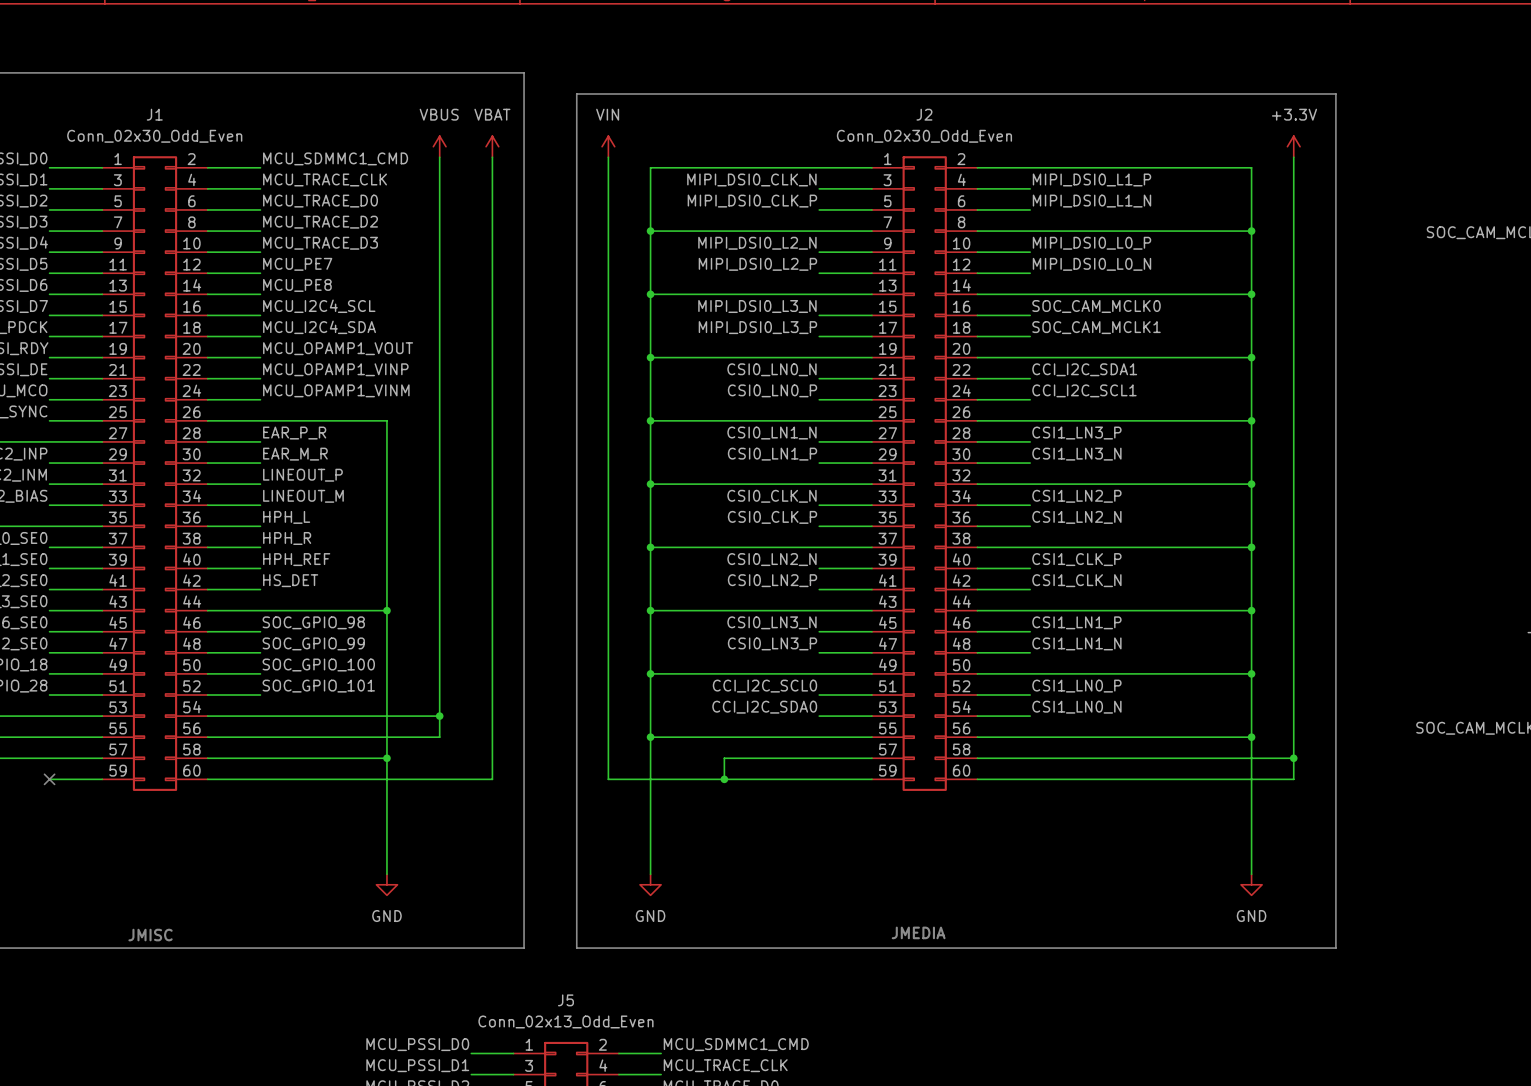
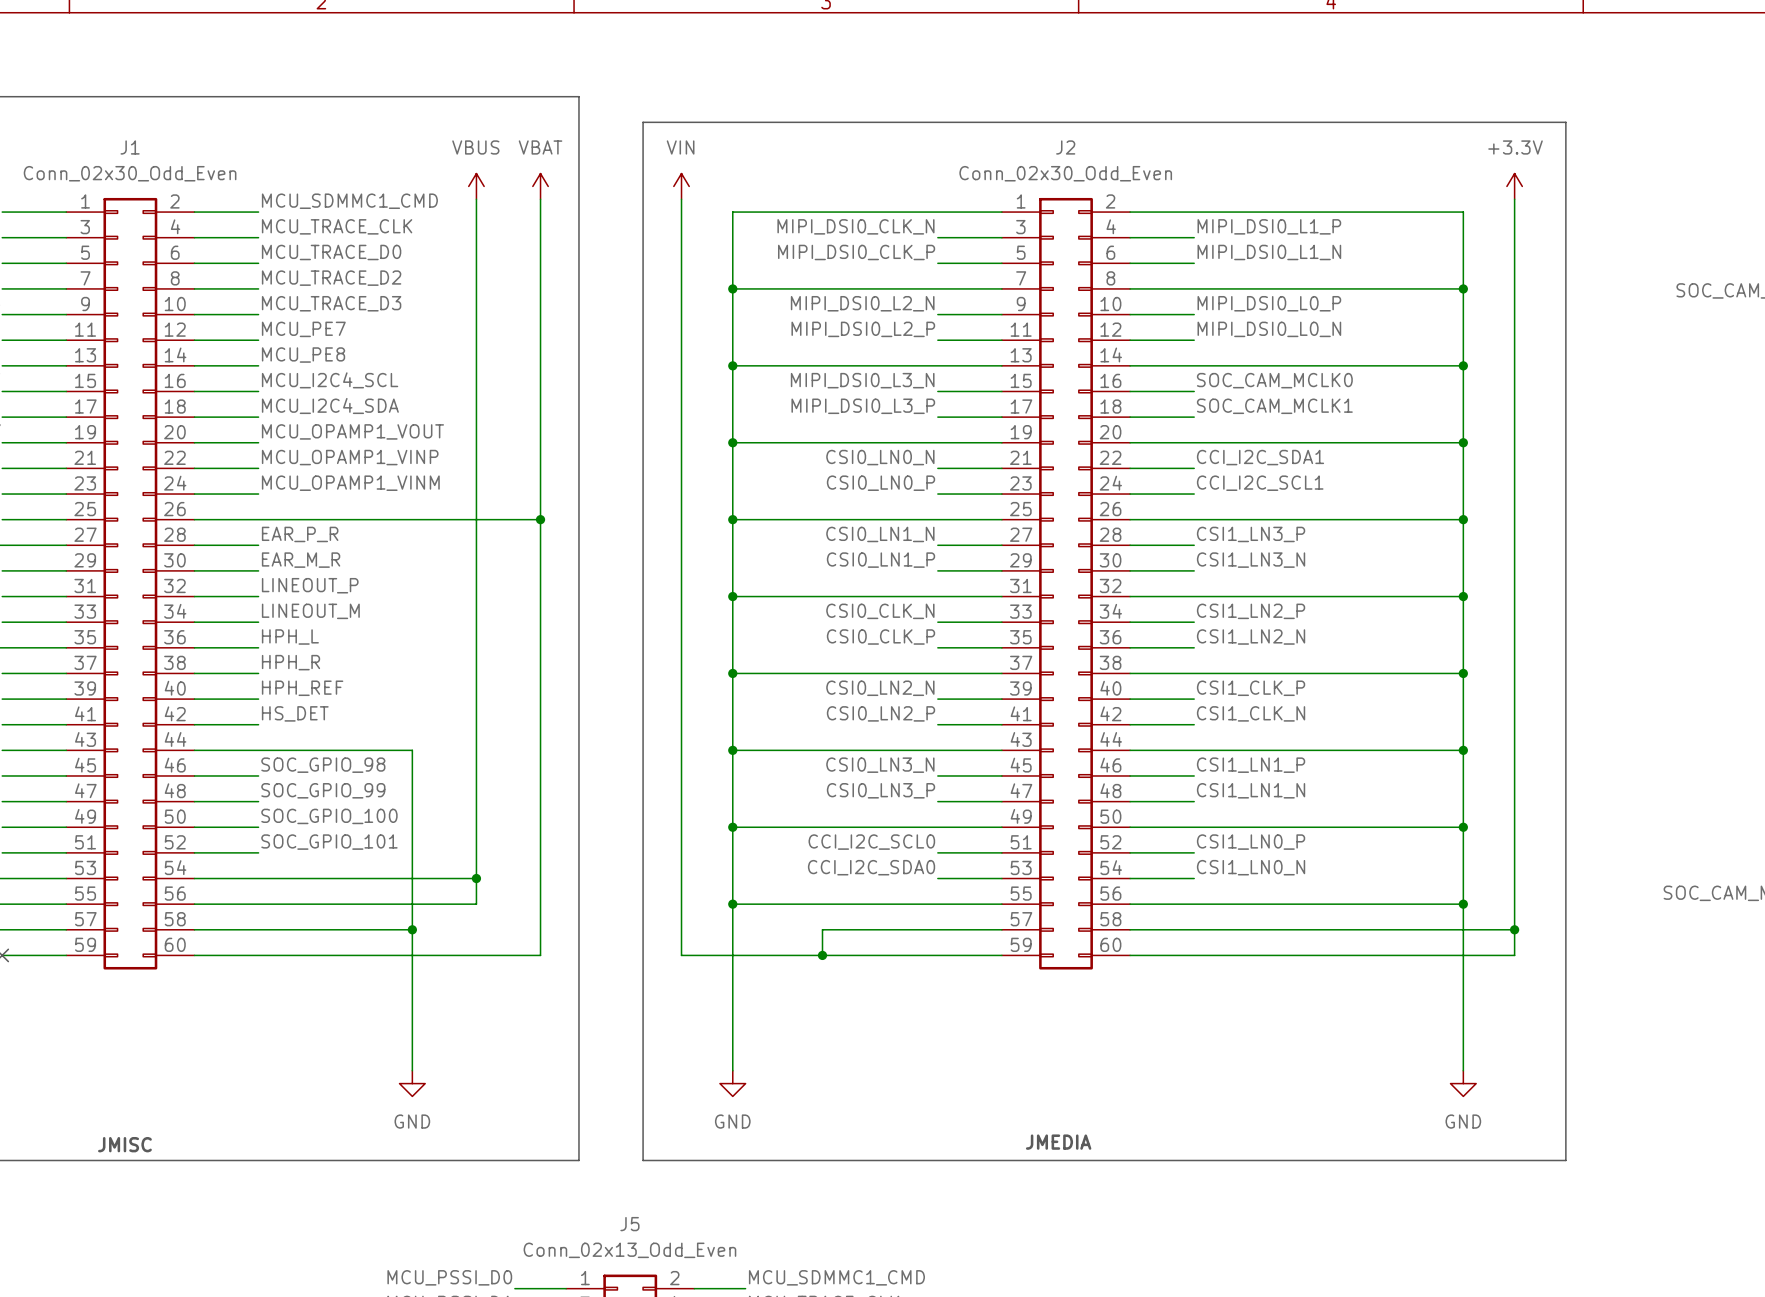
wire: (386, 420) (386, 610) -> (412, 519) (540, 519)
junction: none -> (540, 519)
junction: (386, 610) -> none

